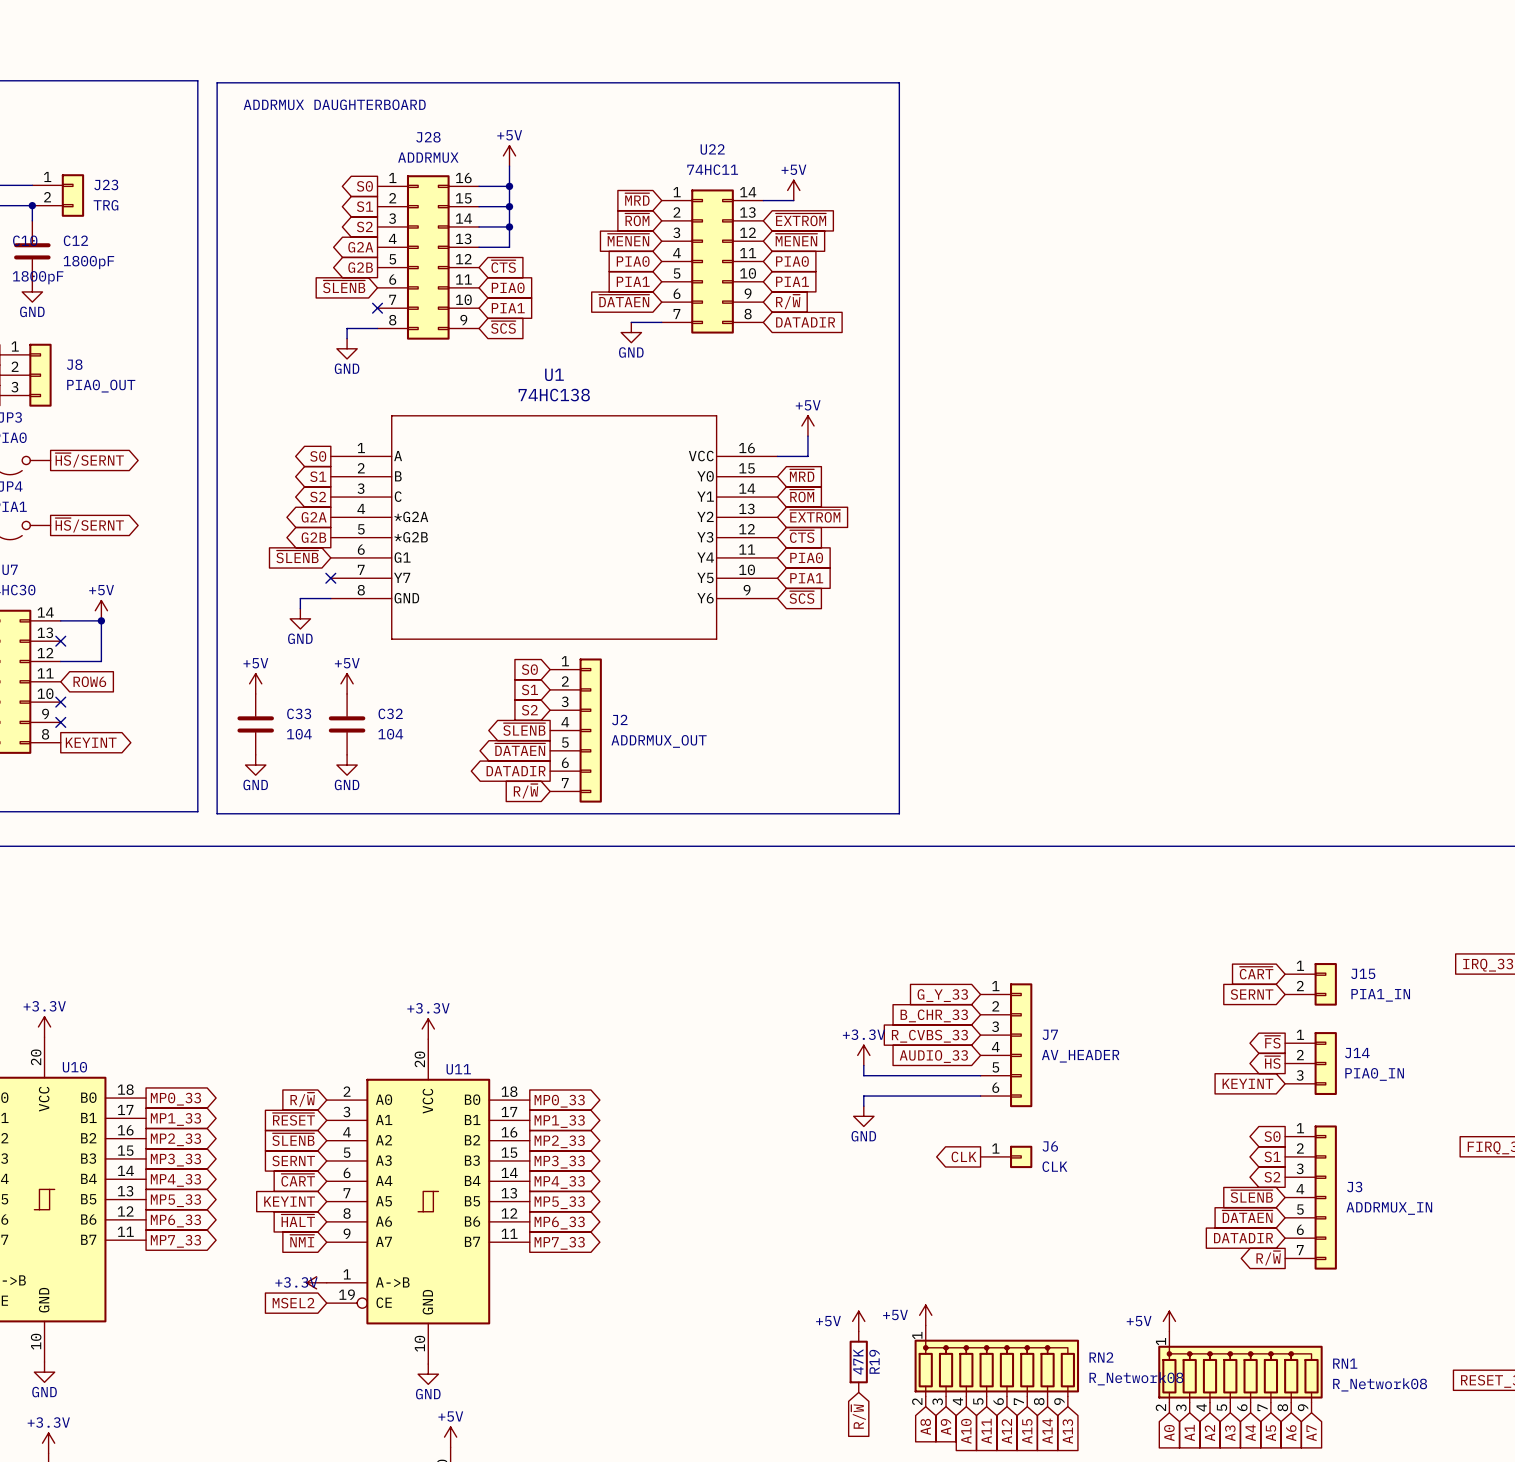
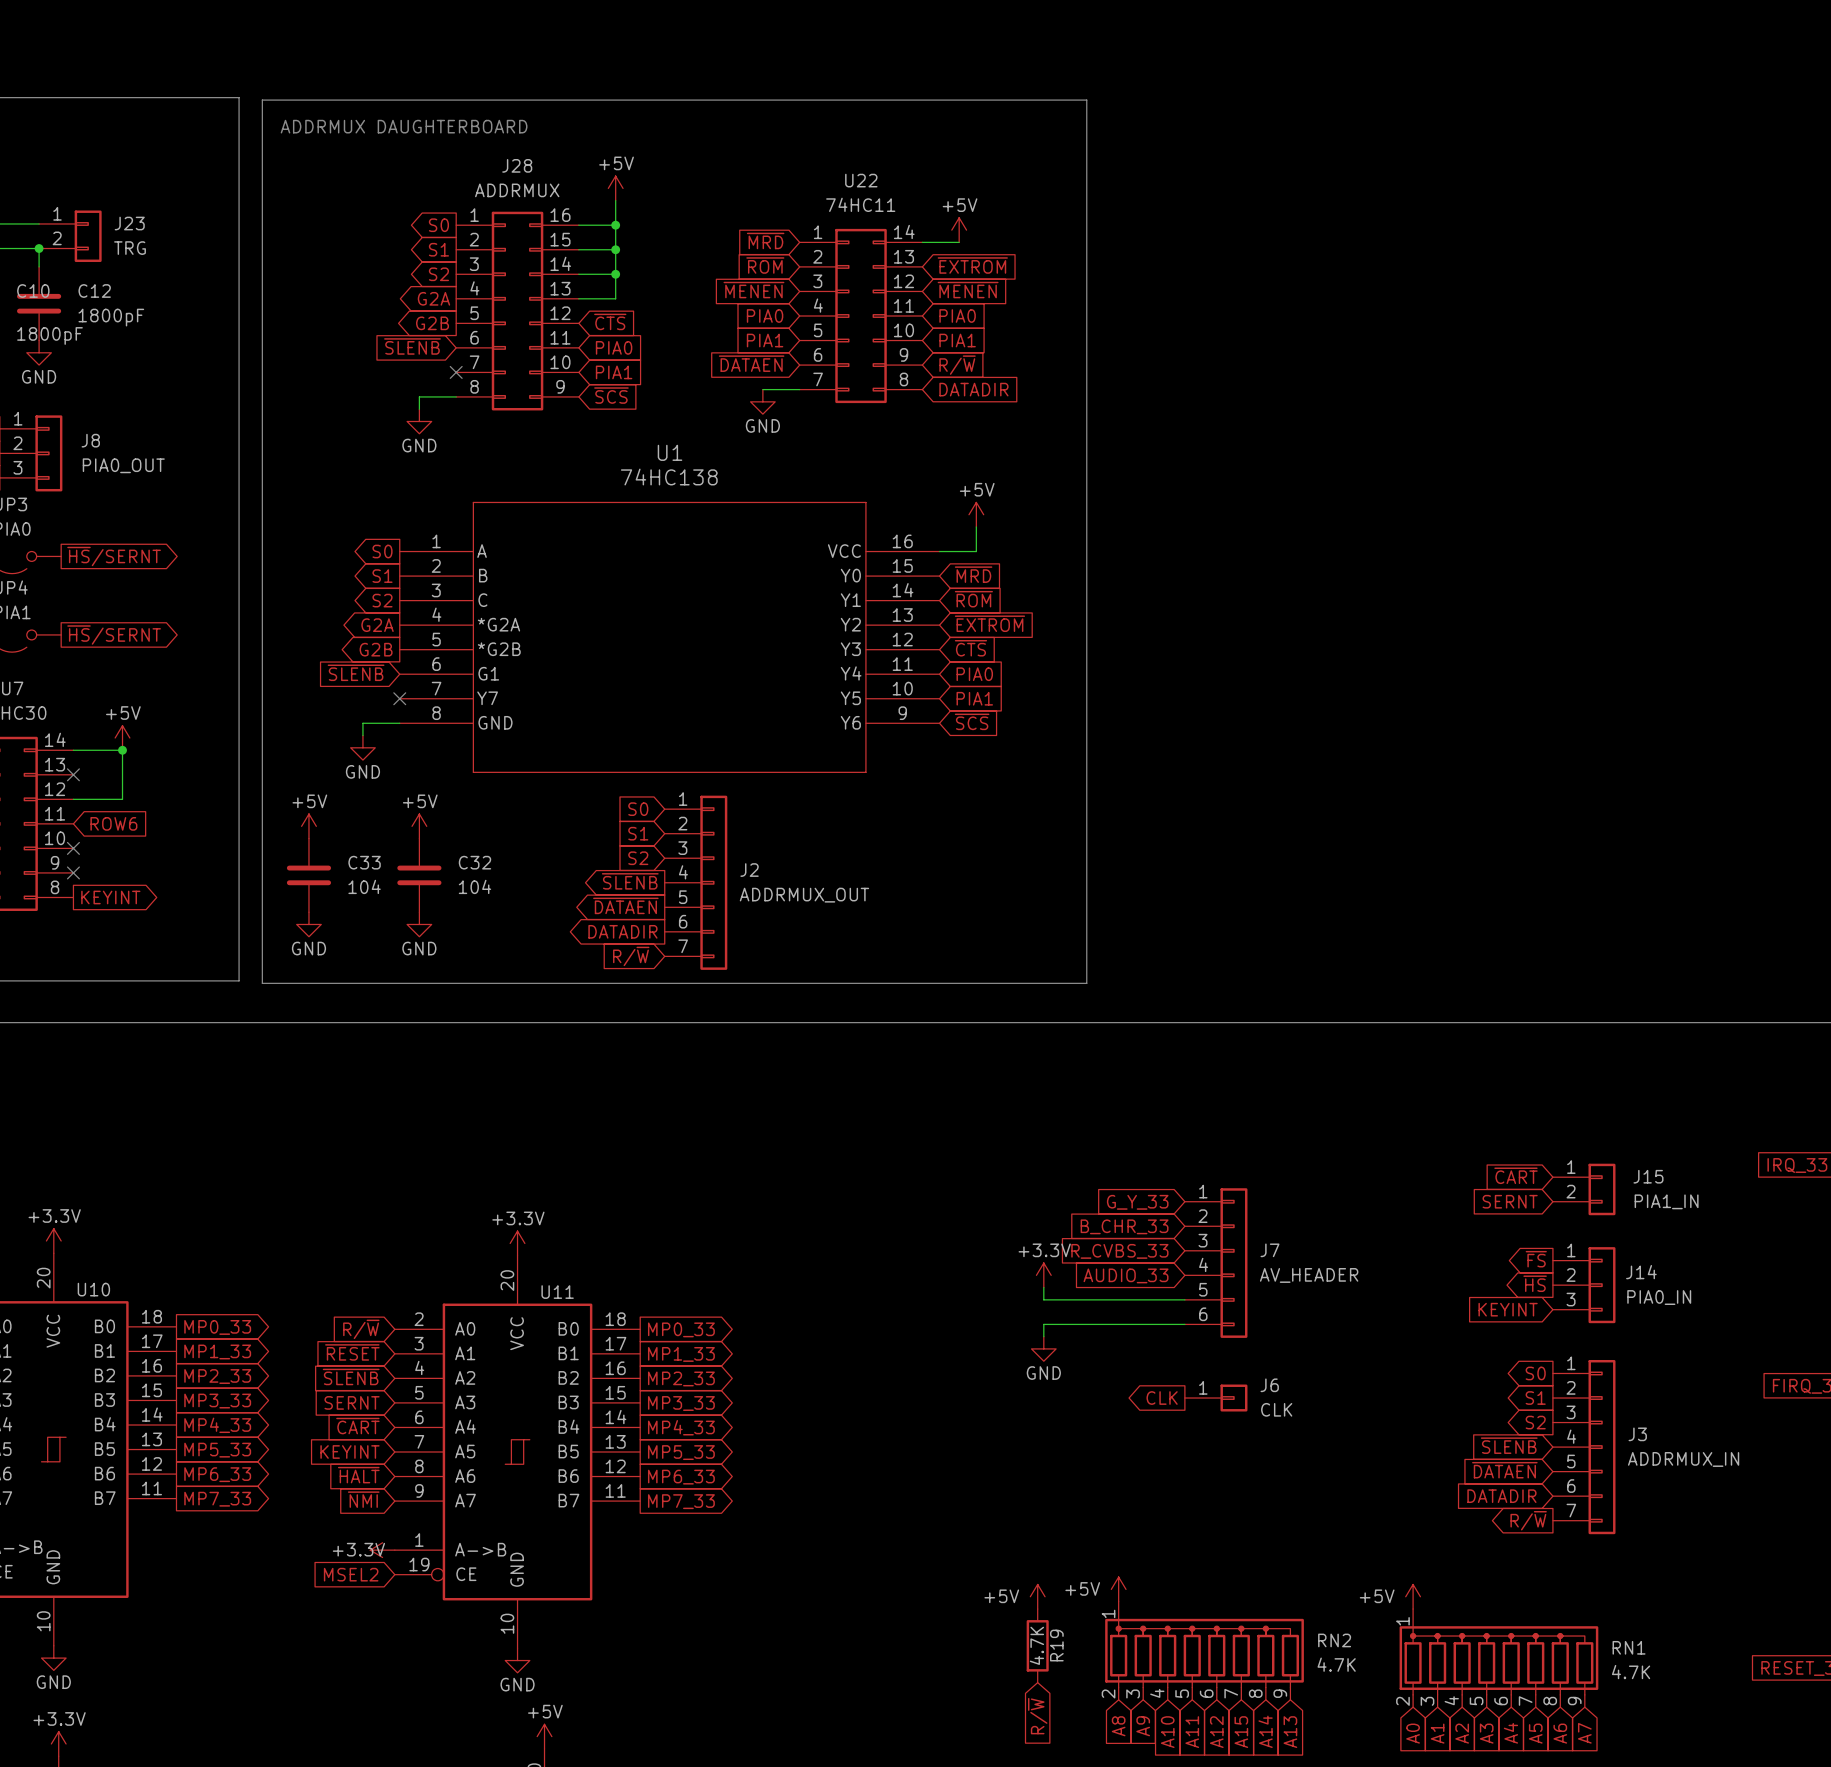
R19 value: 47K (858, 1361) -> 4.7K (1036, 1645)
RN2 value: R_Network08 (1136, 1378) -> 4.7K (1336, 1664)
RN1 value: R_Network08 (1380, 1384) -> 4.7K (1631, 1672)

